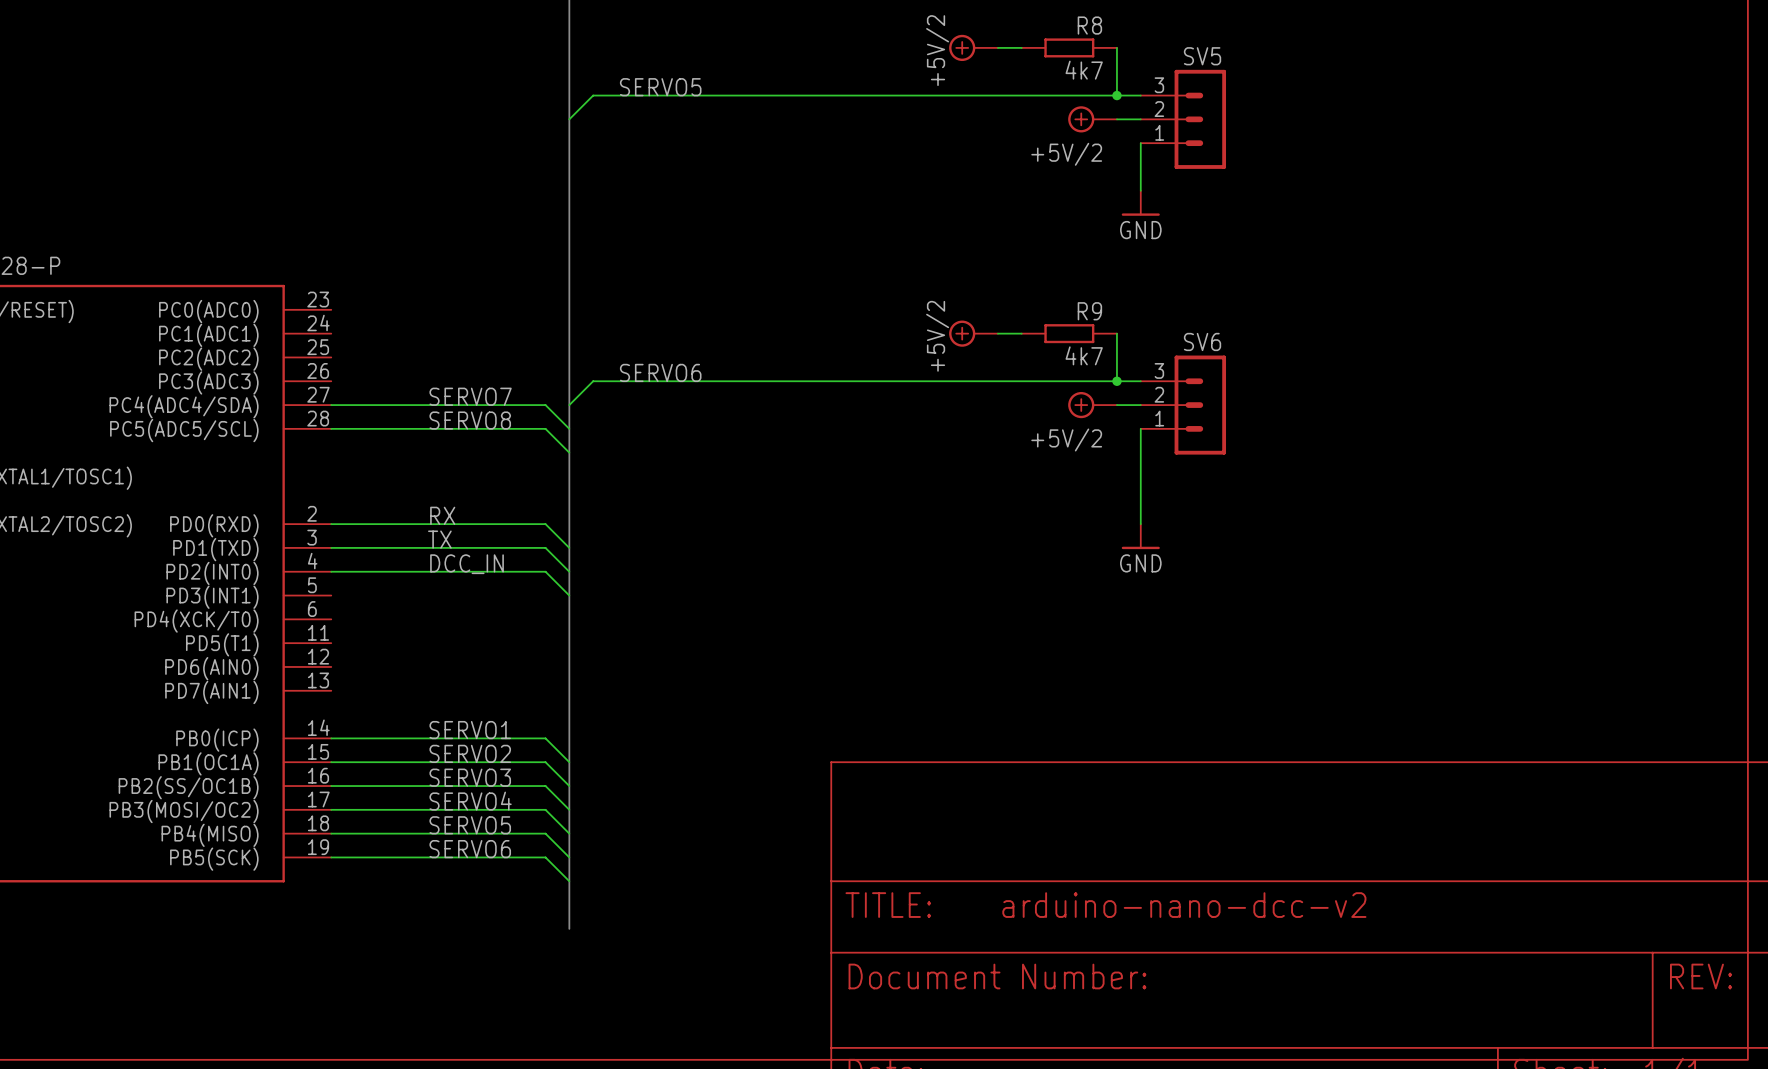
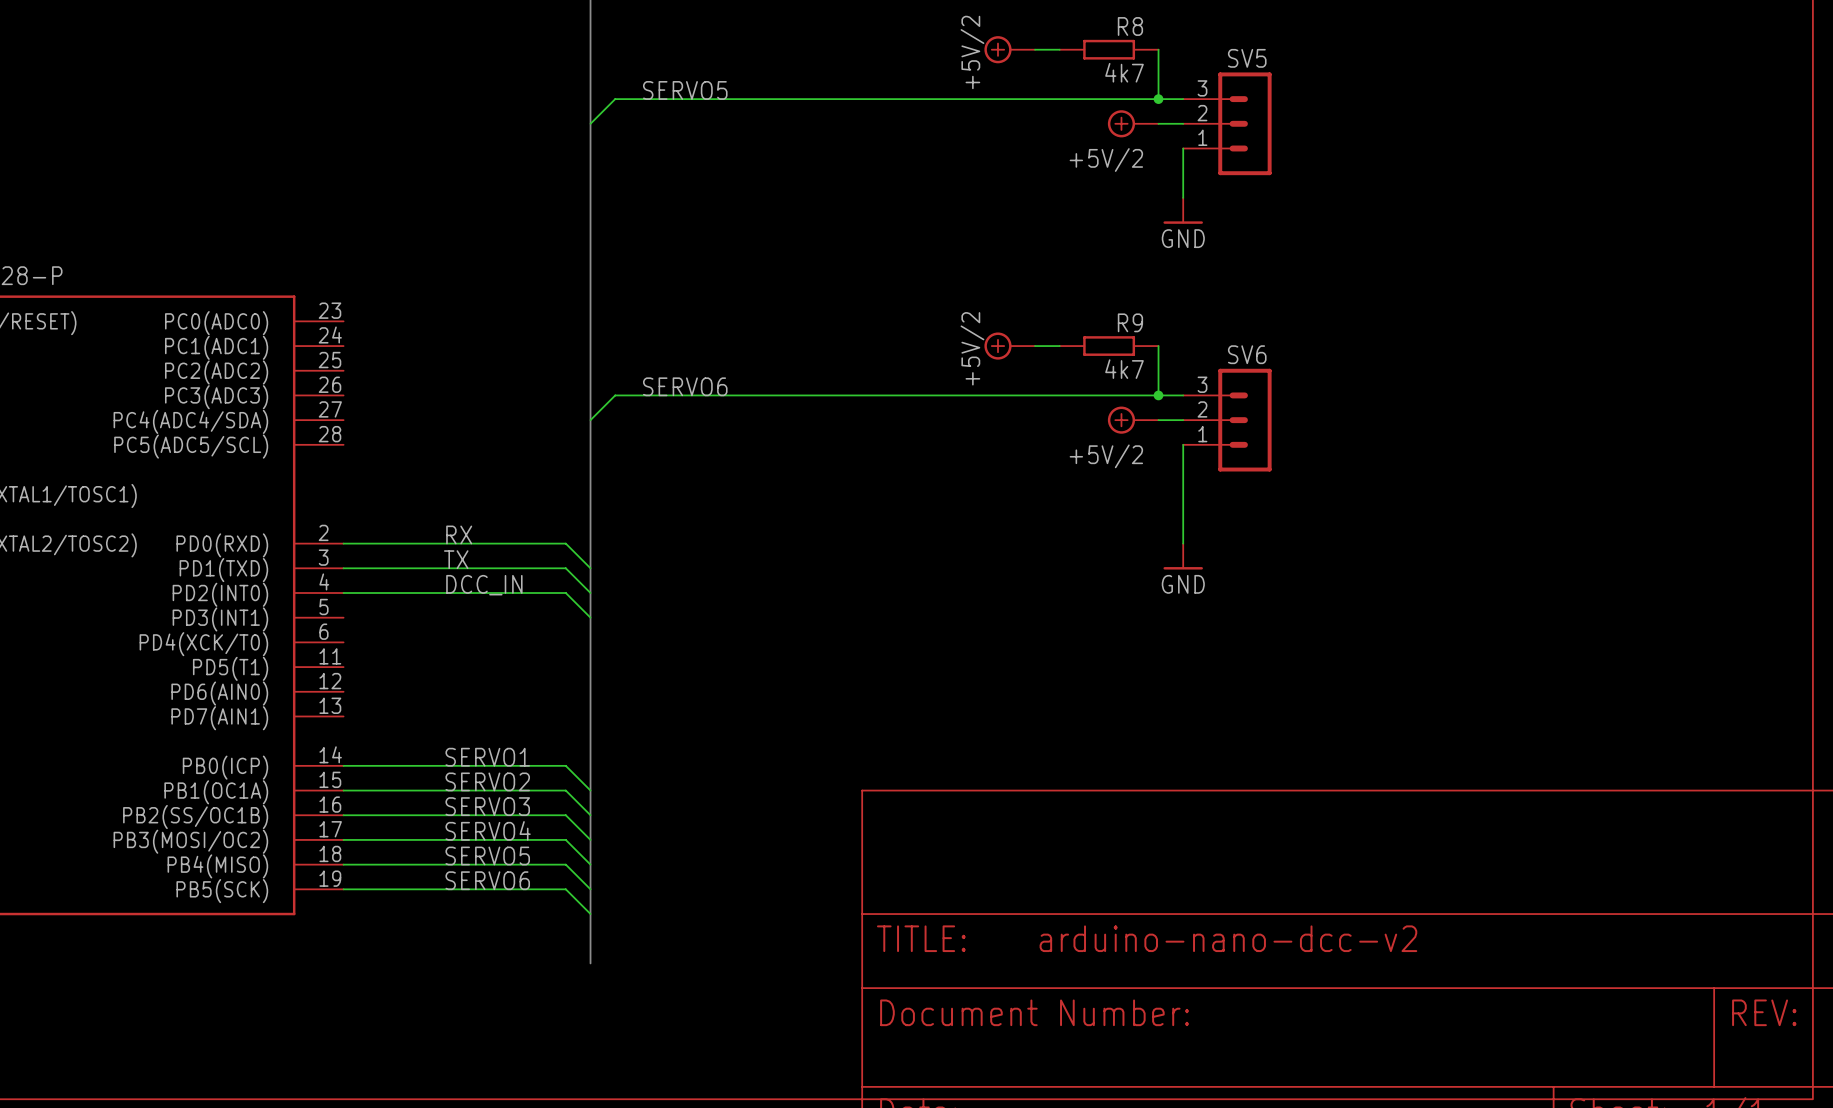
label: SERVO7 (470, 396) -> none
wire: (331, 405) (545, 405) (569, 428) -> none
label: SERVO8 (470, 420) -> none
wire: (331, 428) (545, 428) (569, 452) -> none

